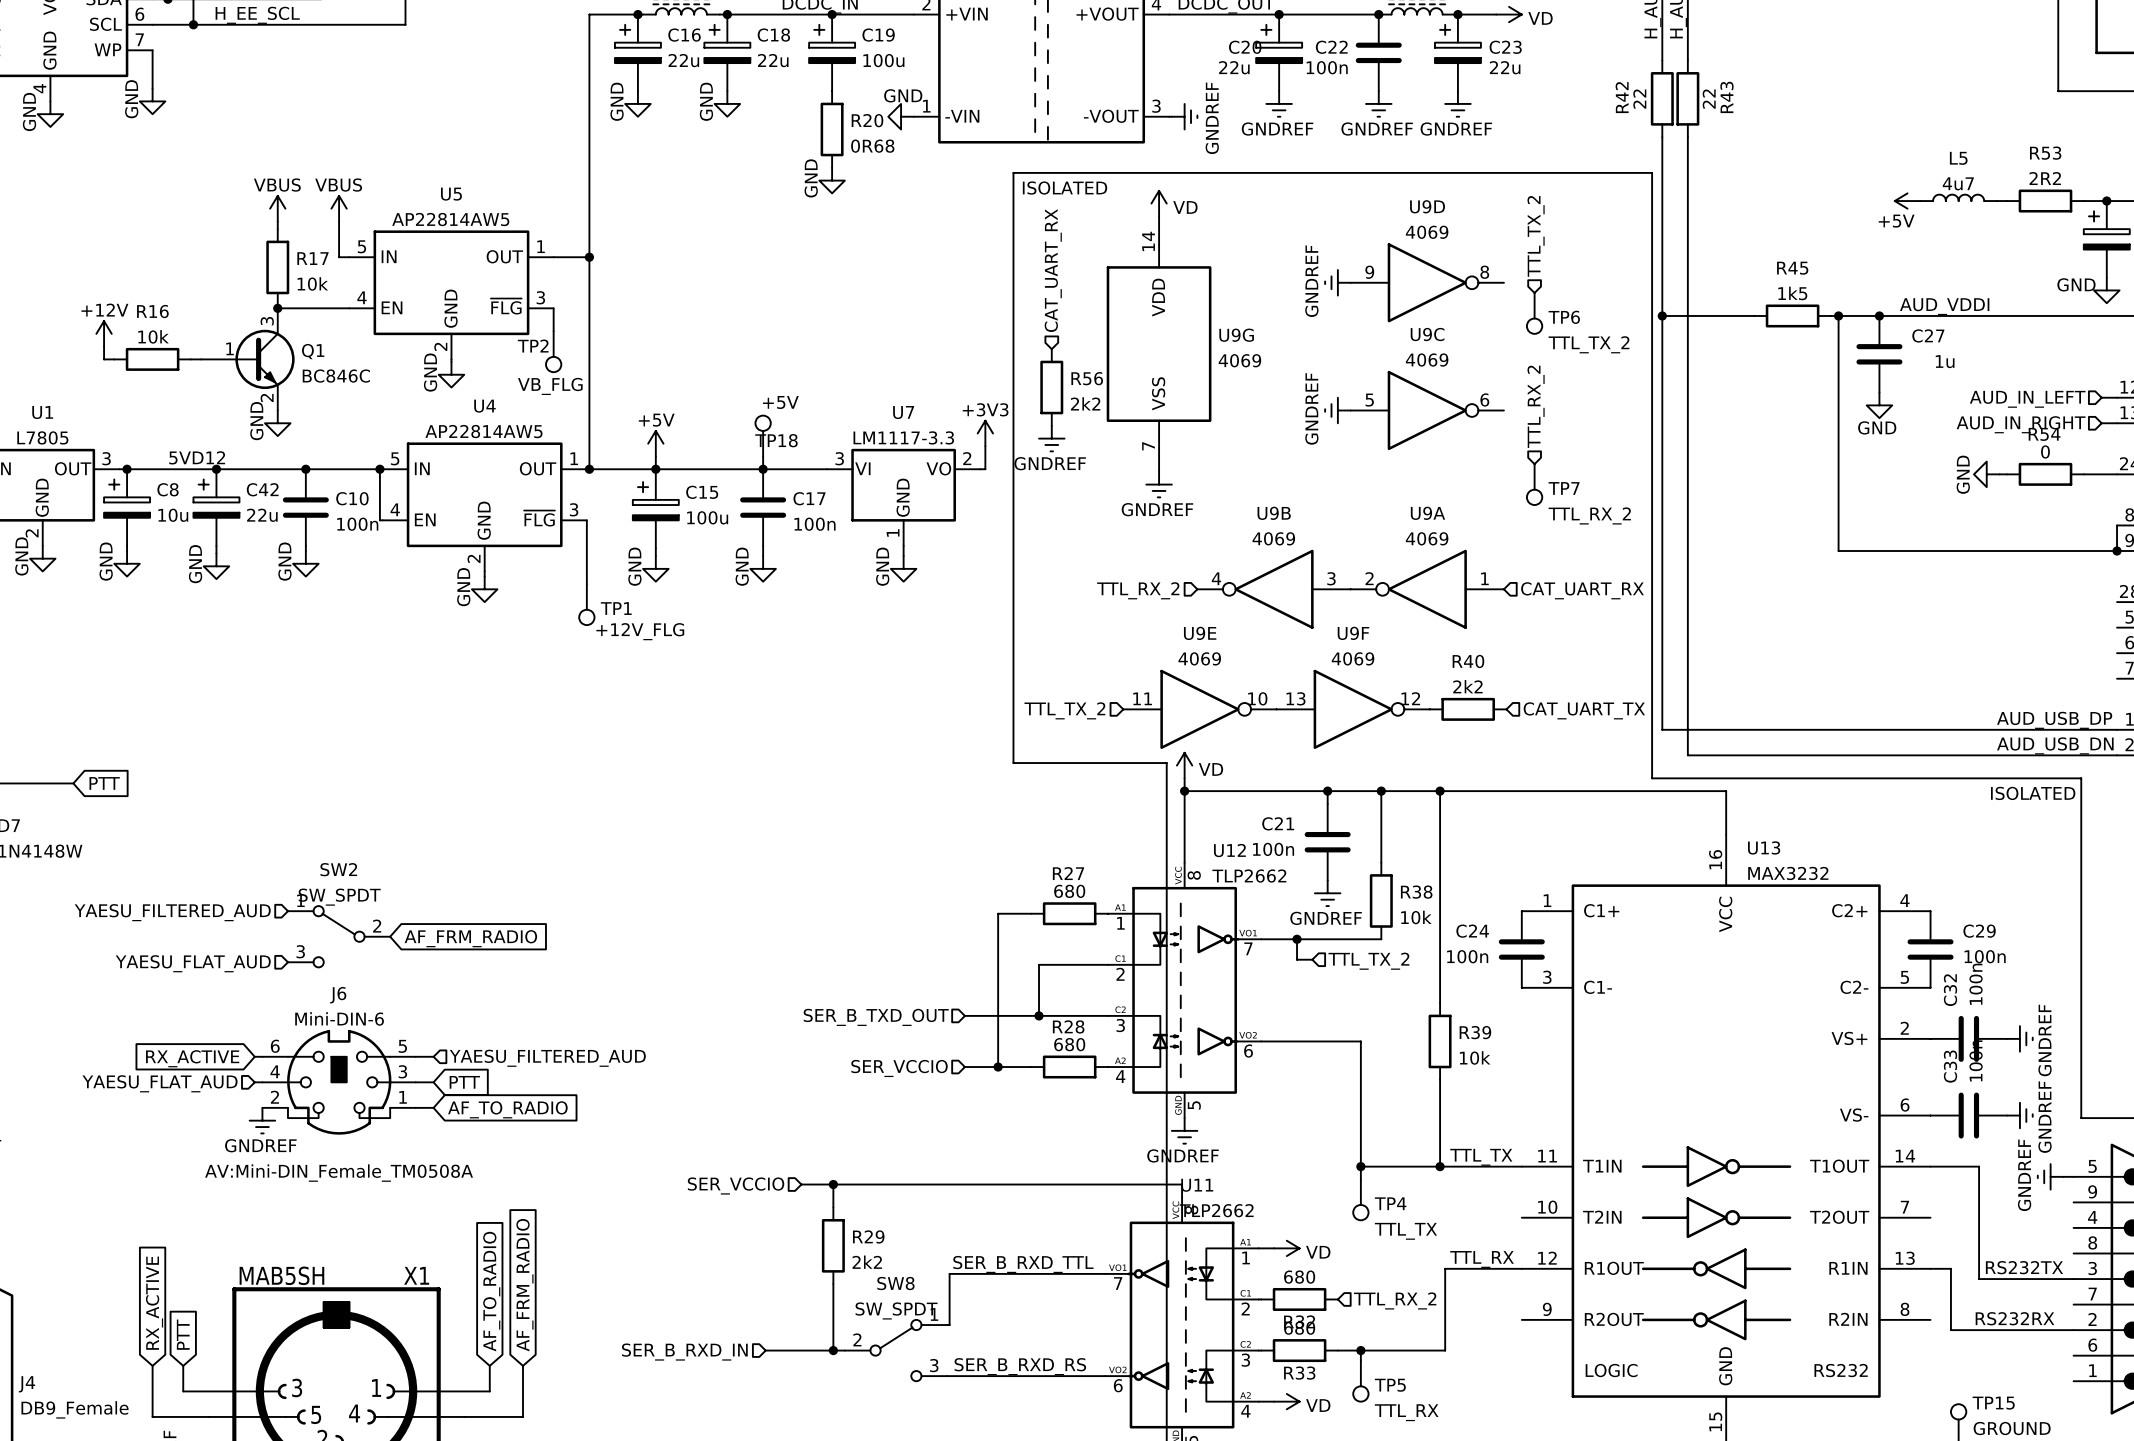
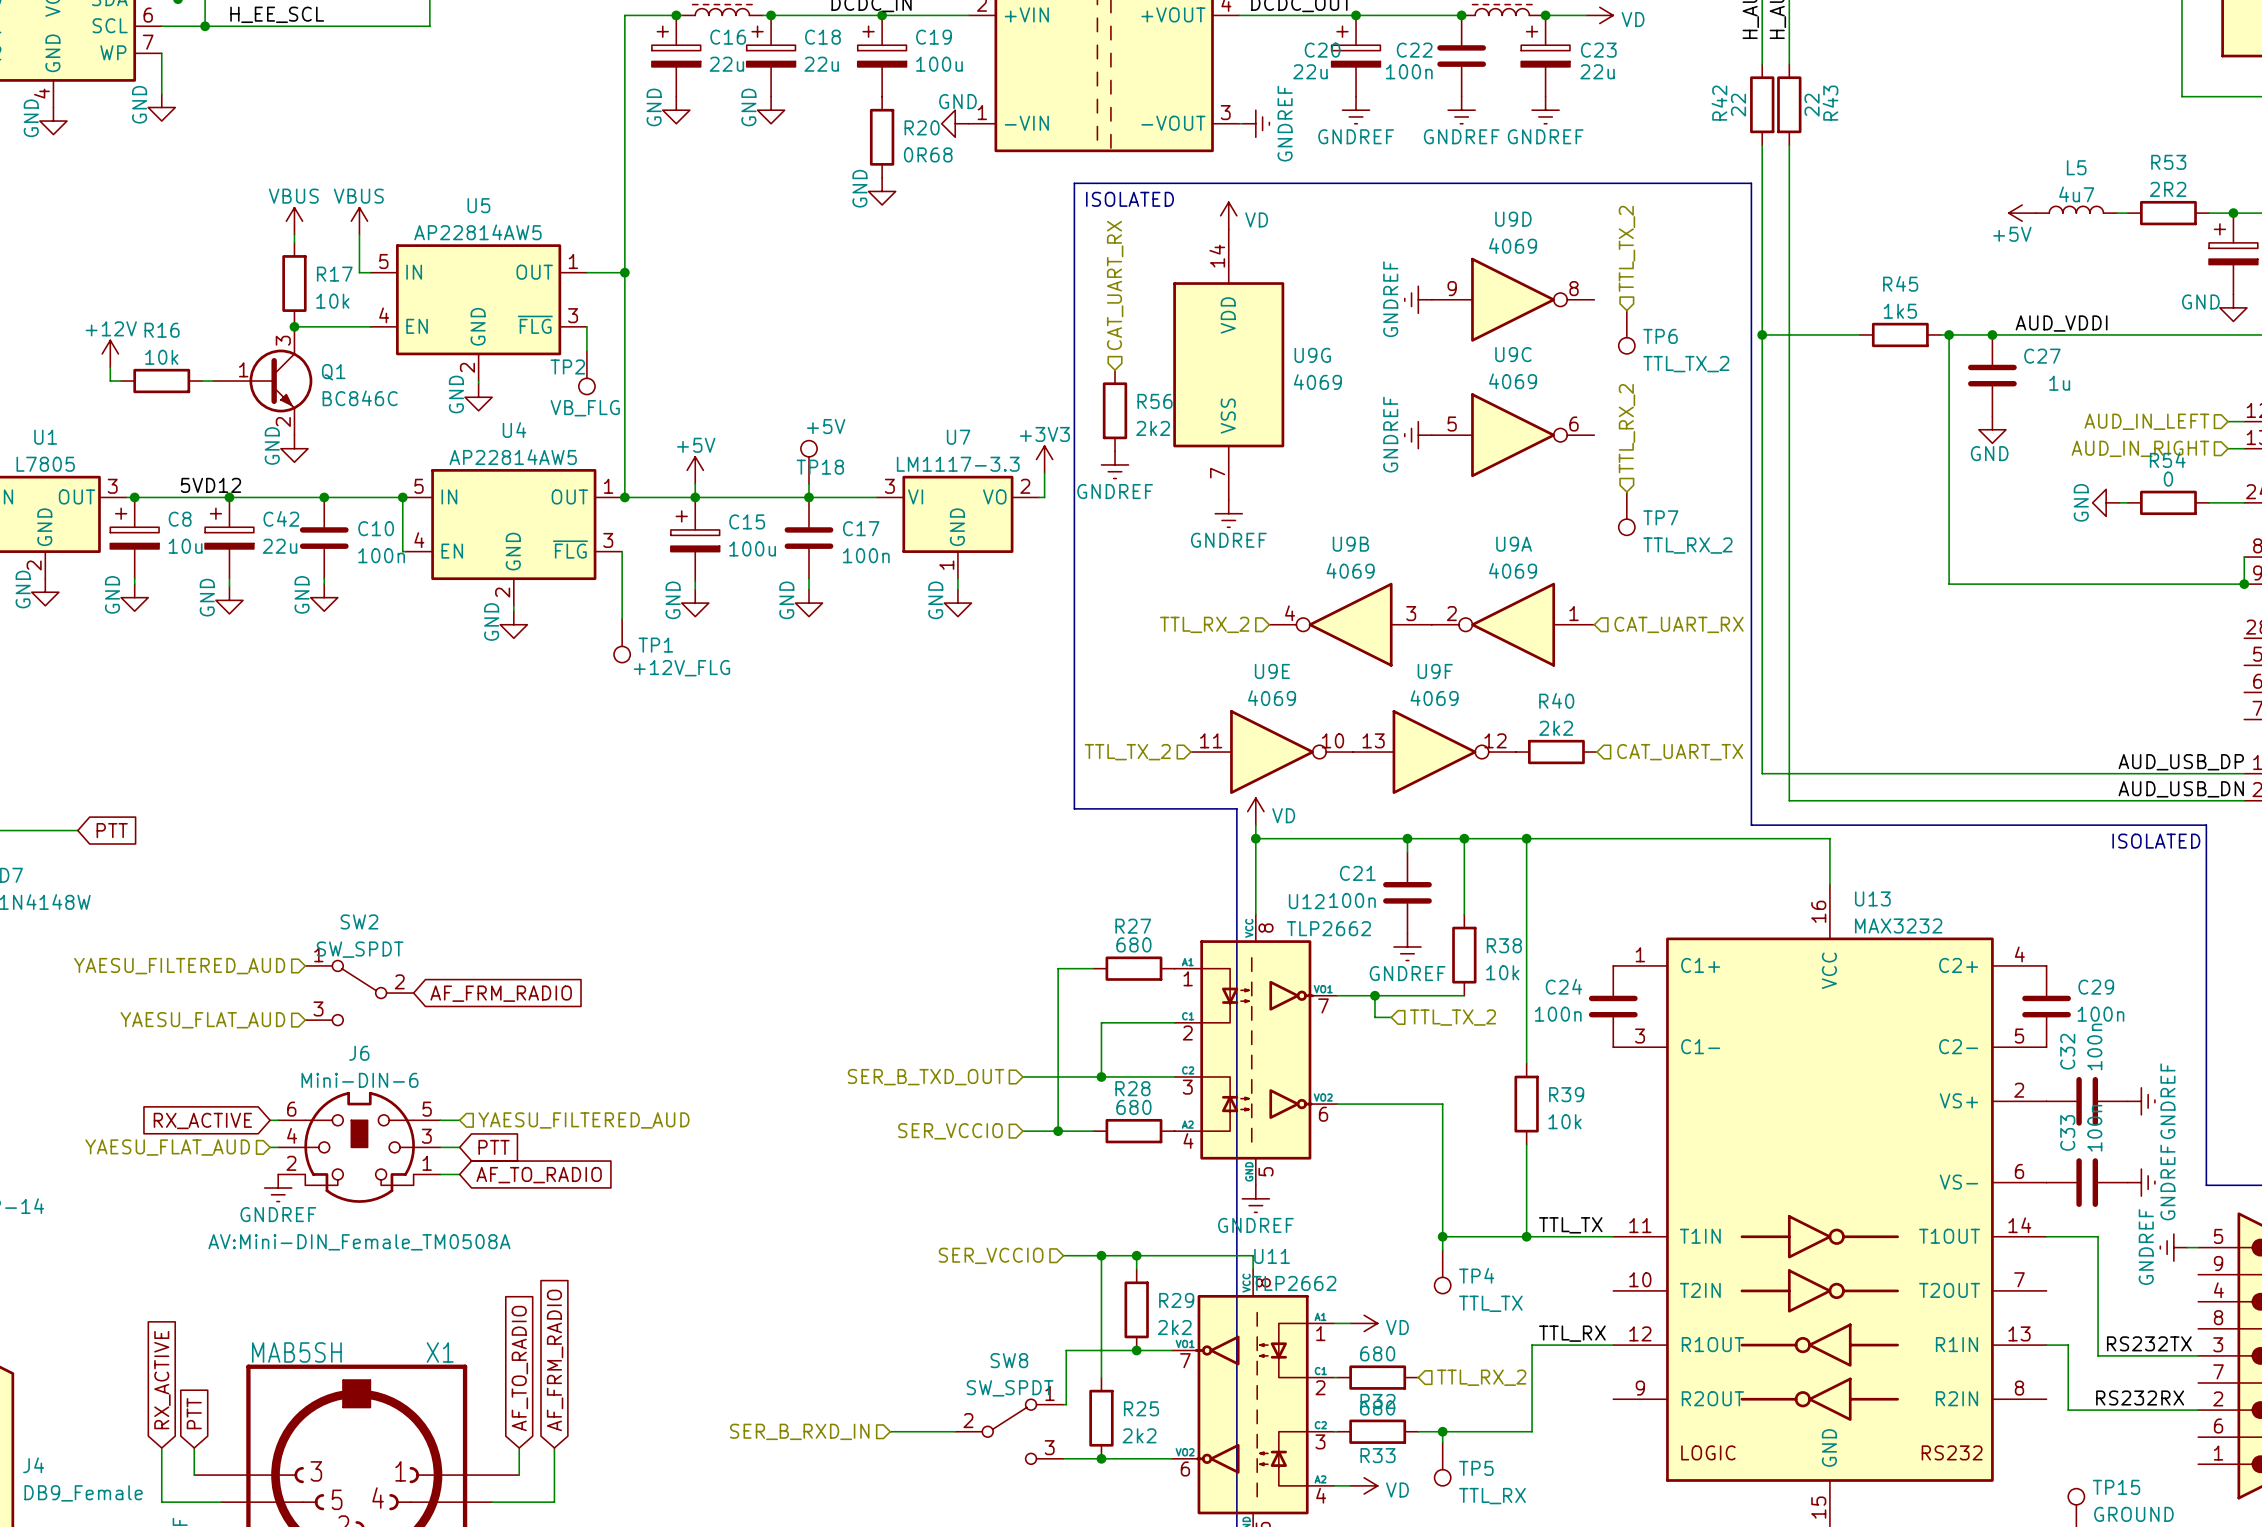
wire: (801, 1184) (1003, 1184) -> none
wire: (833, 1184) (833, 1207) -> none
junction: (833, 1184) -> none
wire: none -> (1101, 1255) (1101, 1377)
junction: none -> (1101, 1255)
wire: none -> (1136, 1255) (1136, 1269)
junction: none -> (1136, 1255)
hierarchical label position: SER_VCCIO (736, 1185) -> SER_VCCIO (991, 1255)
R29 position: (833, 1245) -> (1136, 1309)
label: SER_B_RXD_TTL (1023, 1264) -> none
wire: (1005, 1273) (949, 1273) (949, 1325) (947, 1325) -> (1066, 1350) (1066, 1404) (1063, 1404)
junction: none -> (1136, 1350)
wire: (833, 1284) (833, 1350) -> none
R25: none -> 2k2 (1101, 1418)
wire: (765, 1350) (839, 1350) -> none
junction: (833, 1350) -> none
SW8 position: (895, 1350) -> (1009, 1431)
hierarchical label position: SER_B_RXD_IN (684, 1352) -> SER_B_RXD_IN (799, 1431)
label: SER_B_RXD_RS (1020, 1366) -> none
wire: (947, 1376) (1003, 1376) -> (895, 1431) (955, 1431)
junction: none -> (1101, 1458)

